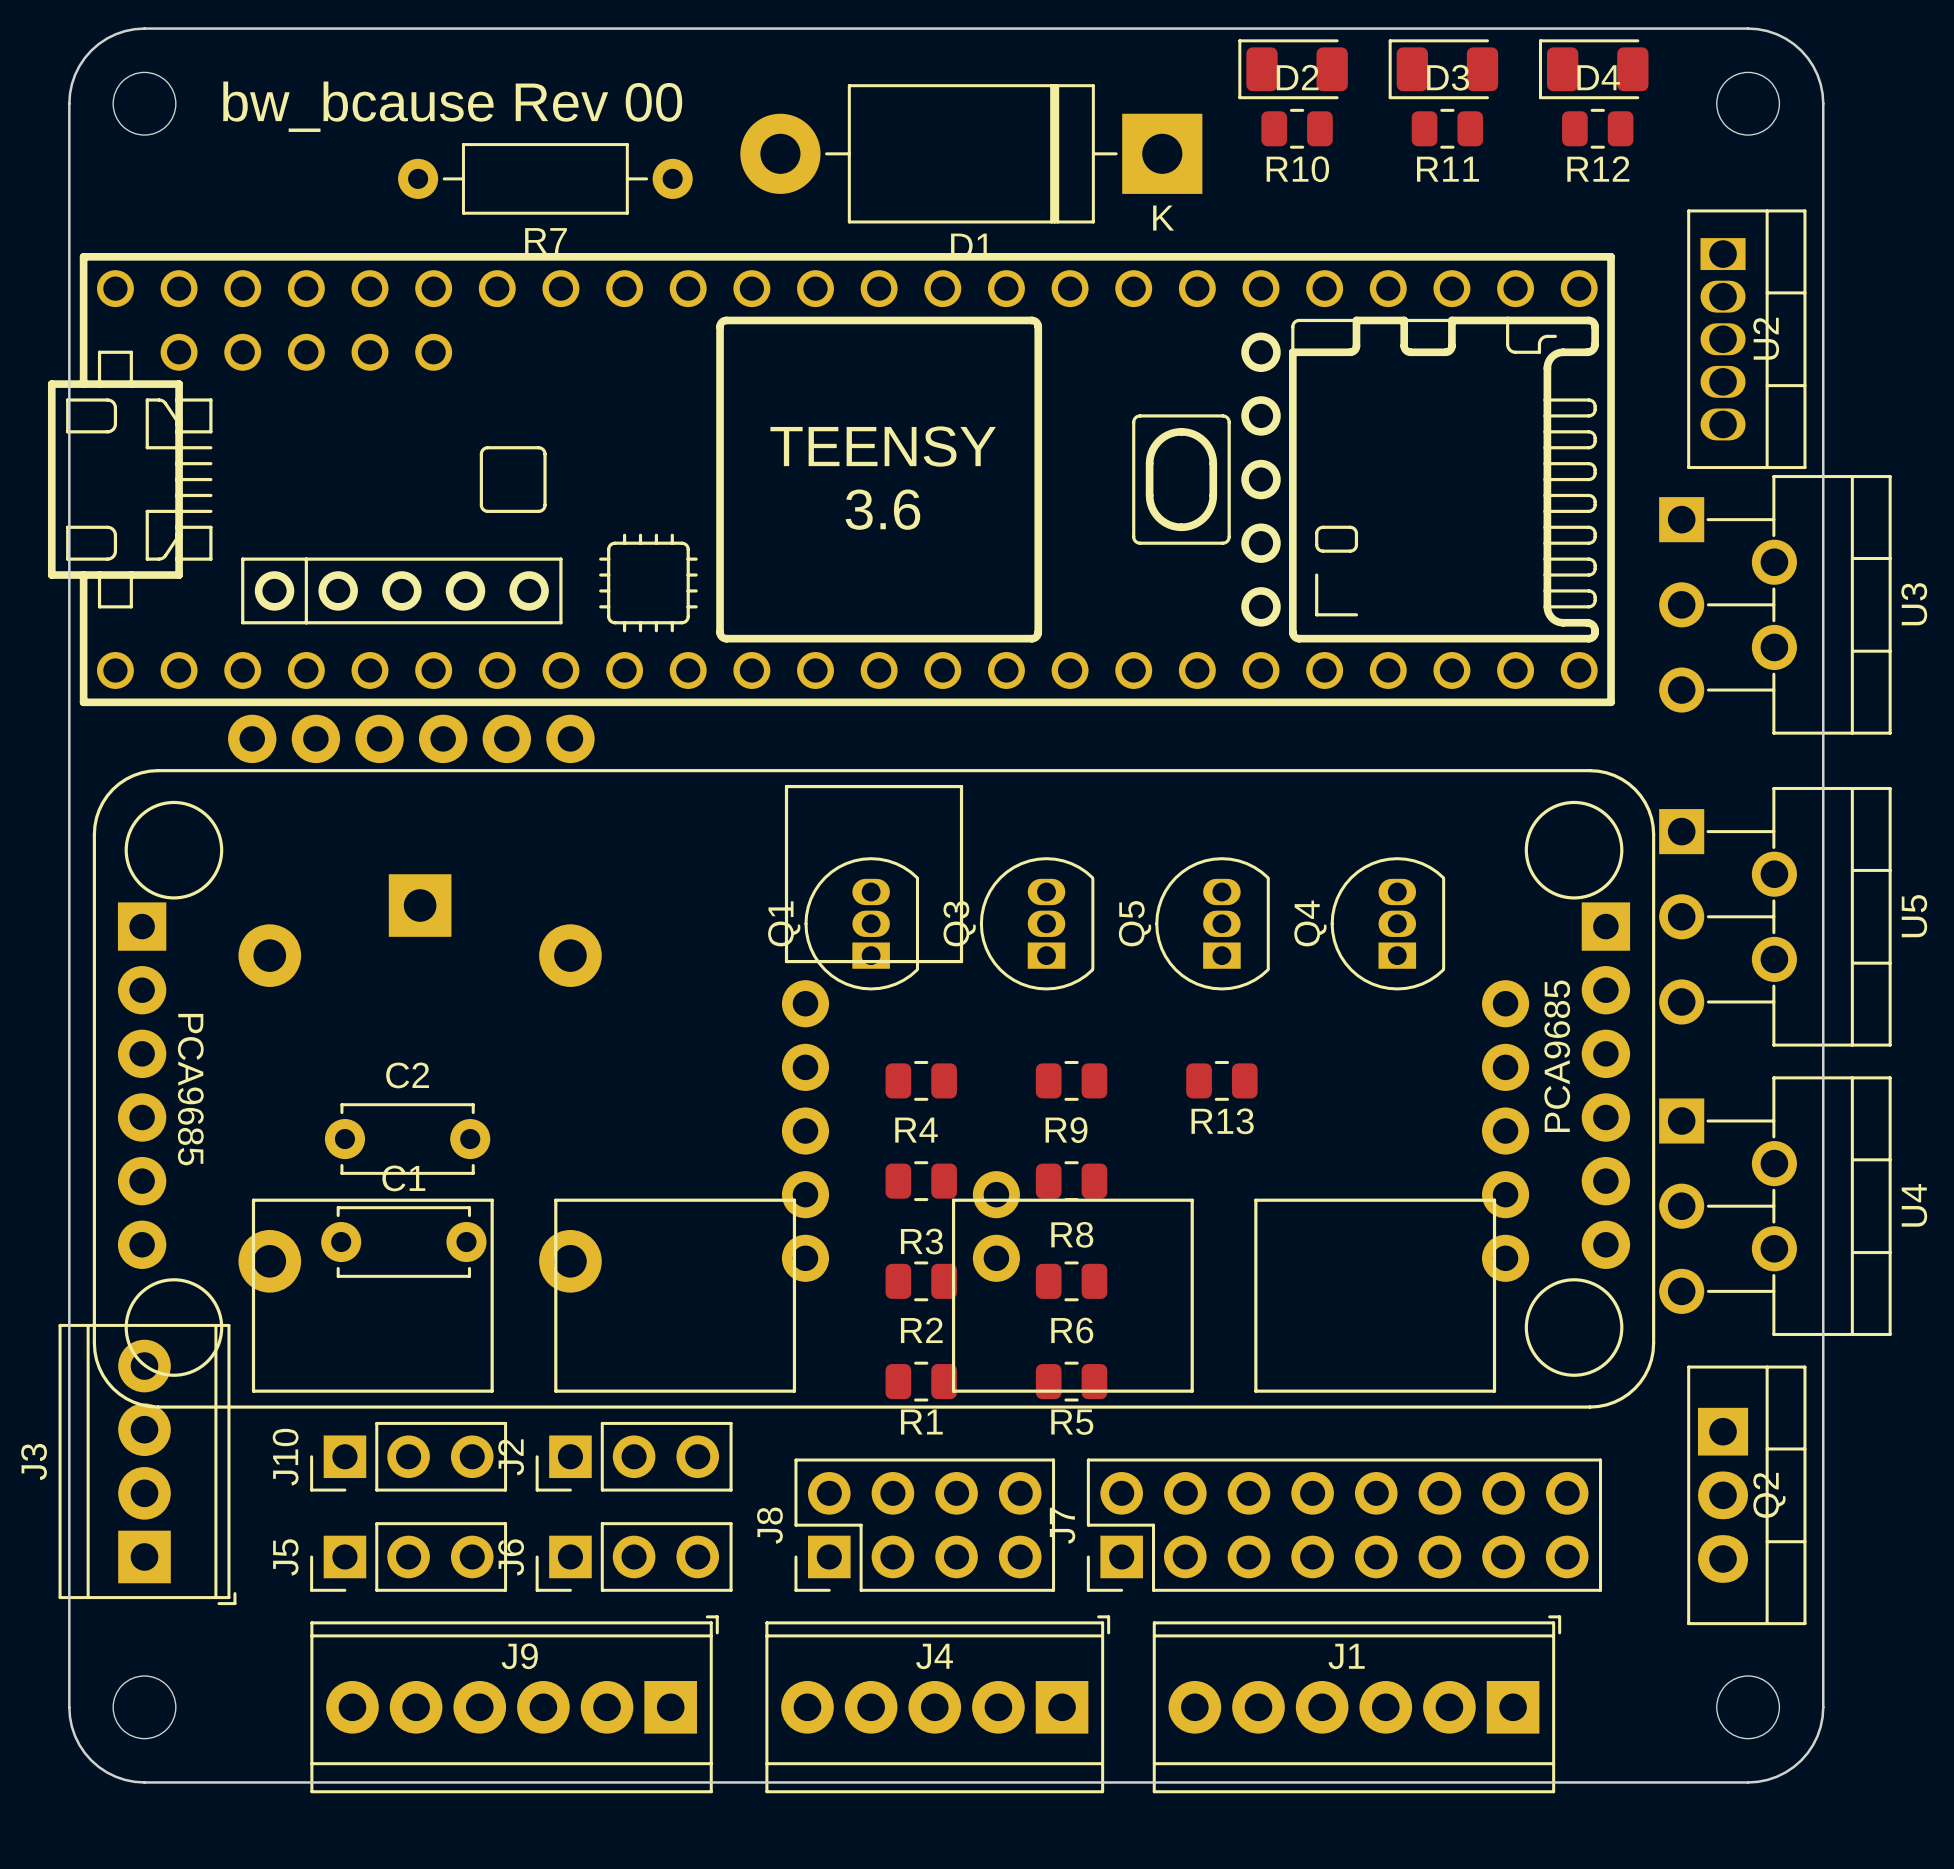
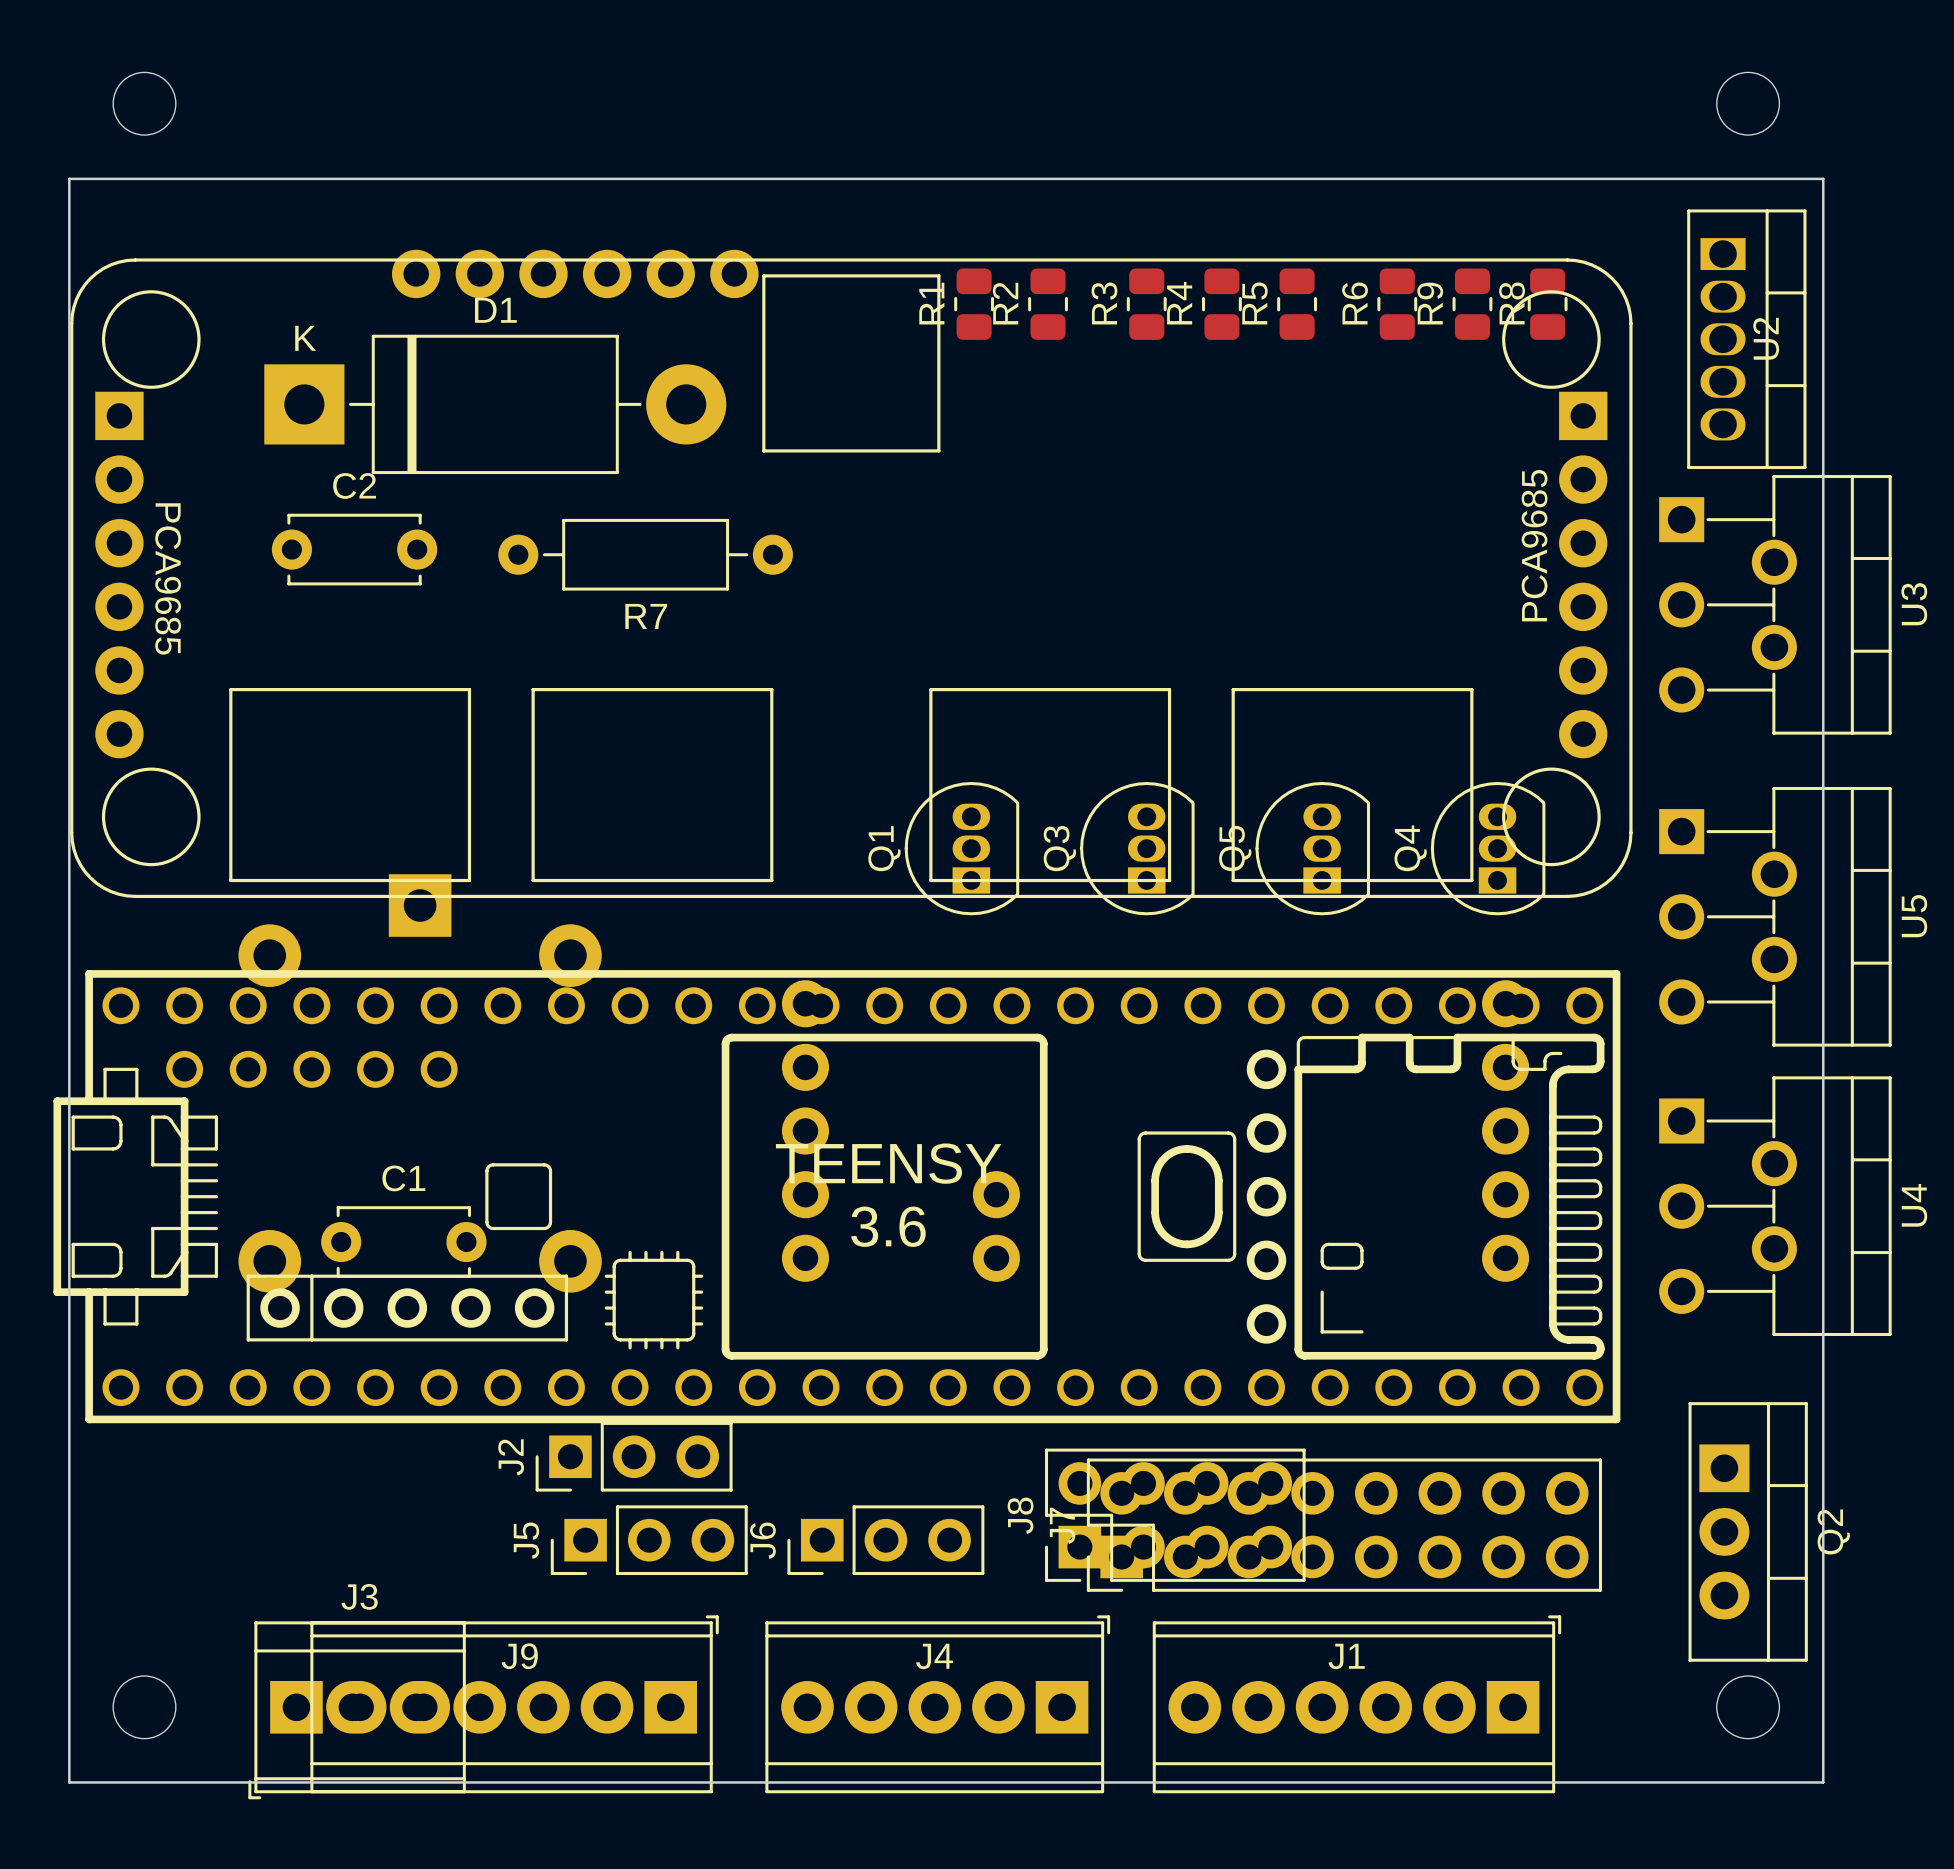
D2: (1293, 69) -> none
D3: (1443, 69) -> none
D4: (1593, 69) -> none
text: bw_bcause Rev 00 (452, 106) -> none
R10: (1297, 128) -> none
R11: (1447, 128) -> none
R12: (1597, 128) -> none
D1 rotation: 0° (971, 153) -> 180° (495, 404)
D1 position: (971, 153) -> (495, 404)
board edge: (69, 178) (69, 93) (79, 66) (91, 50) (106, 38) (125, 31) (144, 28) (1757, 29) (1776, 34) (1793, 44) (1807, 57) (1817, 74) (1823, 103) (1823, 178) -> (69, 178) (1823, 178)
R7 position: (545, 178) -> (645, 554)
part: (831, 479) -> none
part position: (411, 738) -> (575, 273)
Q1 position: (861, 923) -> (961, 848)
Q3 position: (1037, 923) -> (1137, 848)
Q5 position: (1212, 923) -> (1312, 848)
Q4 position: (1387, 923) -> (1488, 848)
R4 rotation: 0° (921, 1080) -> 90° clockwise (1221, 304)
R4 position: (921, 1080) -> (1221, 304)
R9 rotation: 0° (1071, 1080) -> 90° clockwise (1472, 304)
R9 position: (1071, 1080) -> (1472, 304)
R13: (1221, 1080) -> none
part position: (874, 1088) -> (851, 578)
C2 position: (407, 1139) -> (354, 549)
R3 rotation: 0° (921, 1181) -> 90° clockwise (1146, 304)
R3 position: (921, 1181) -> (1146, 304)
R8 rotation: 0° (1071, 1181) -> 90° clockwise (1547, 304)
R8 position: (1071, 1181) -> (1547, 304)
part: none -> (836, 1196)
R2 rotation: 0° (921, 1281) -> 90° clockwise (1048, 304)
R2 position: (921, 1281) -> (1048, 304)
R6 rotation: 0° (1071, 1281) -> 90° clockwise (1397, 304)
R6 position: (1071, 1281) -> (1397, 304)
J3 footprint: [58, 1323, 237, 1606] -> [248, 1621, 466, 1800]
R1 rotation: 0° (921, 1381) -> 90° clockwise (974, 304)
R1 position: (921, 1381) -> (974, 304)
R5 rotation: 0° (1071, 1381) -> 90° clockwise (1297, 304)
R5 position: (1071, 1381) -> (1297, 304)
J10: (408, 1456) -> none
J3 name position: J3 (34, 1462) -> J3 (359, 1596)
Q2 position: (1746, 1495) -> (1748, 1531)
Q2 name position: Q2 (1769, 1495) -> Q2 (1833, 1531)
J8 position: (924, 1525) -> (1175, 1515)
J5 position: (408, 1556) -> (649, 1540)
J6 position: (634, 1556) -> (885, 1540)
board edge: (69, 1707) (75, 1736) (91, 1760) (115, 1776) (144, 1782) -> (69, 1707) (69, 1782) (144, 1782)
board edge: (1823, 1707) (1817, 1736) (1801, 1760) (1776, 1776) (1748, 1782) -> (1823, 1707) (1823, 1782) (1748, 1782)

